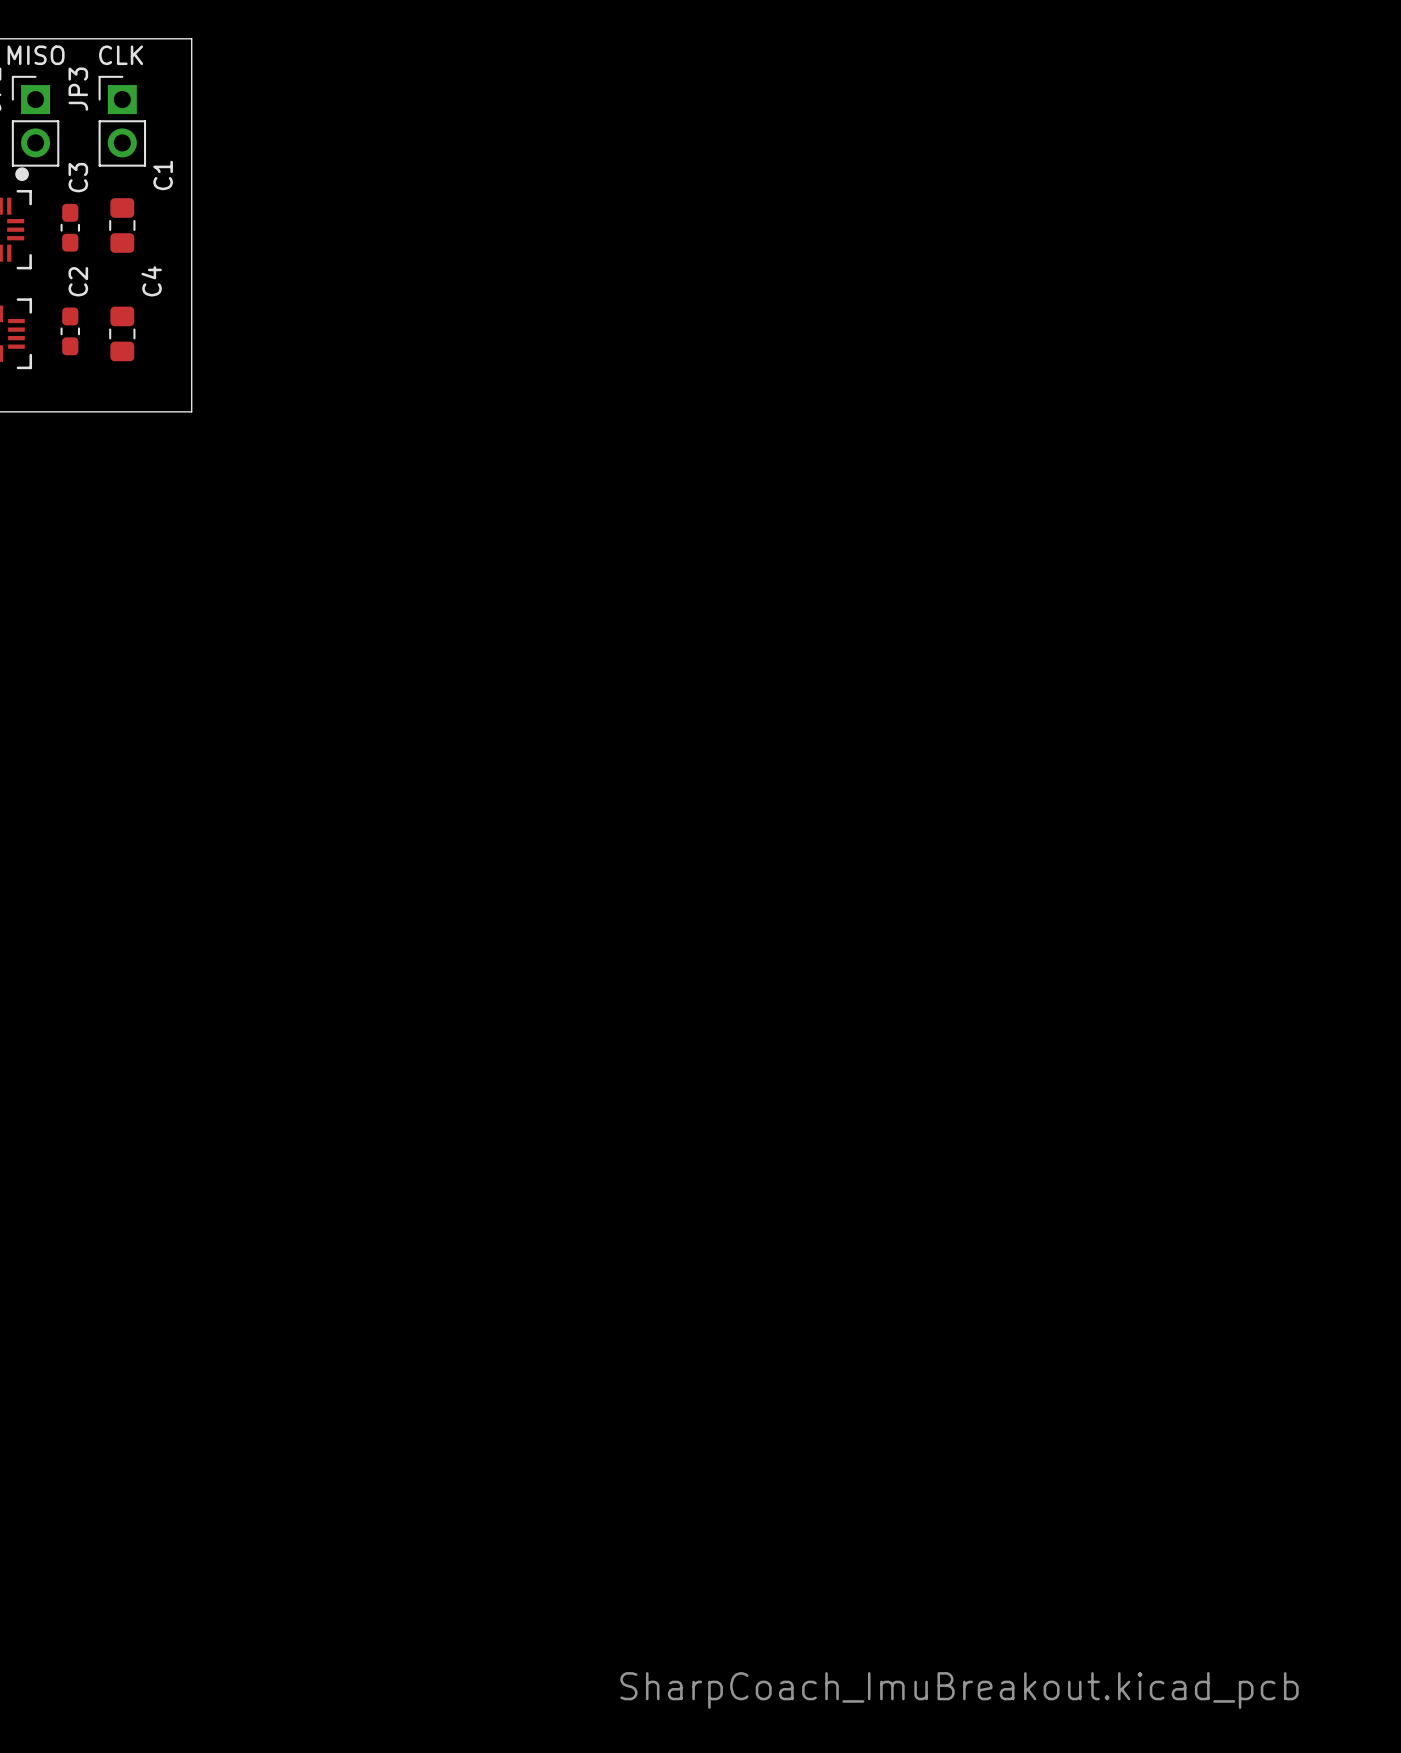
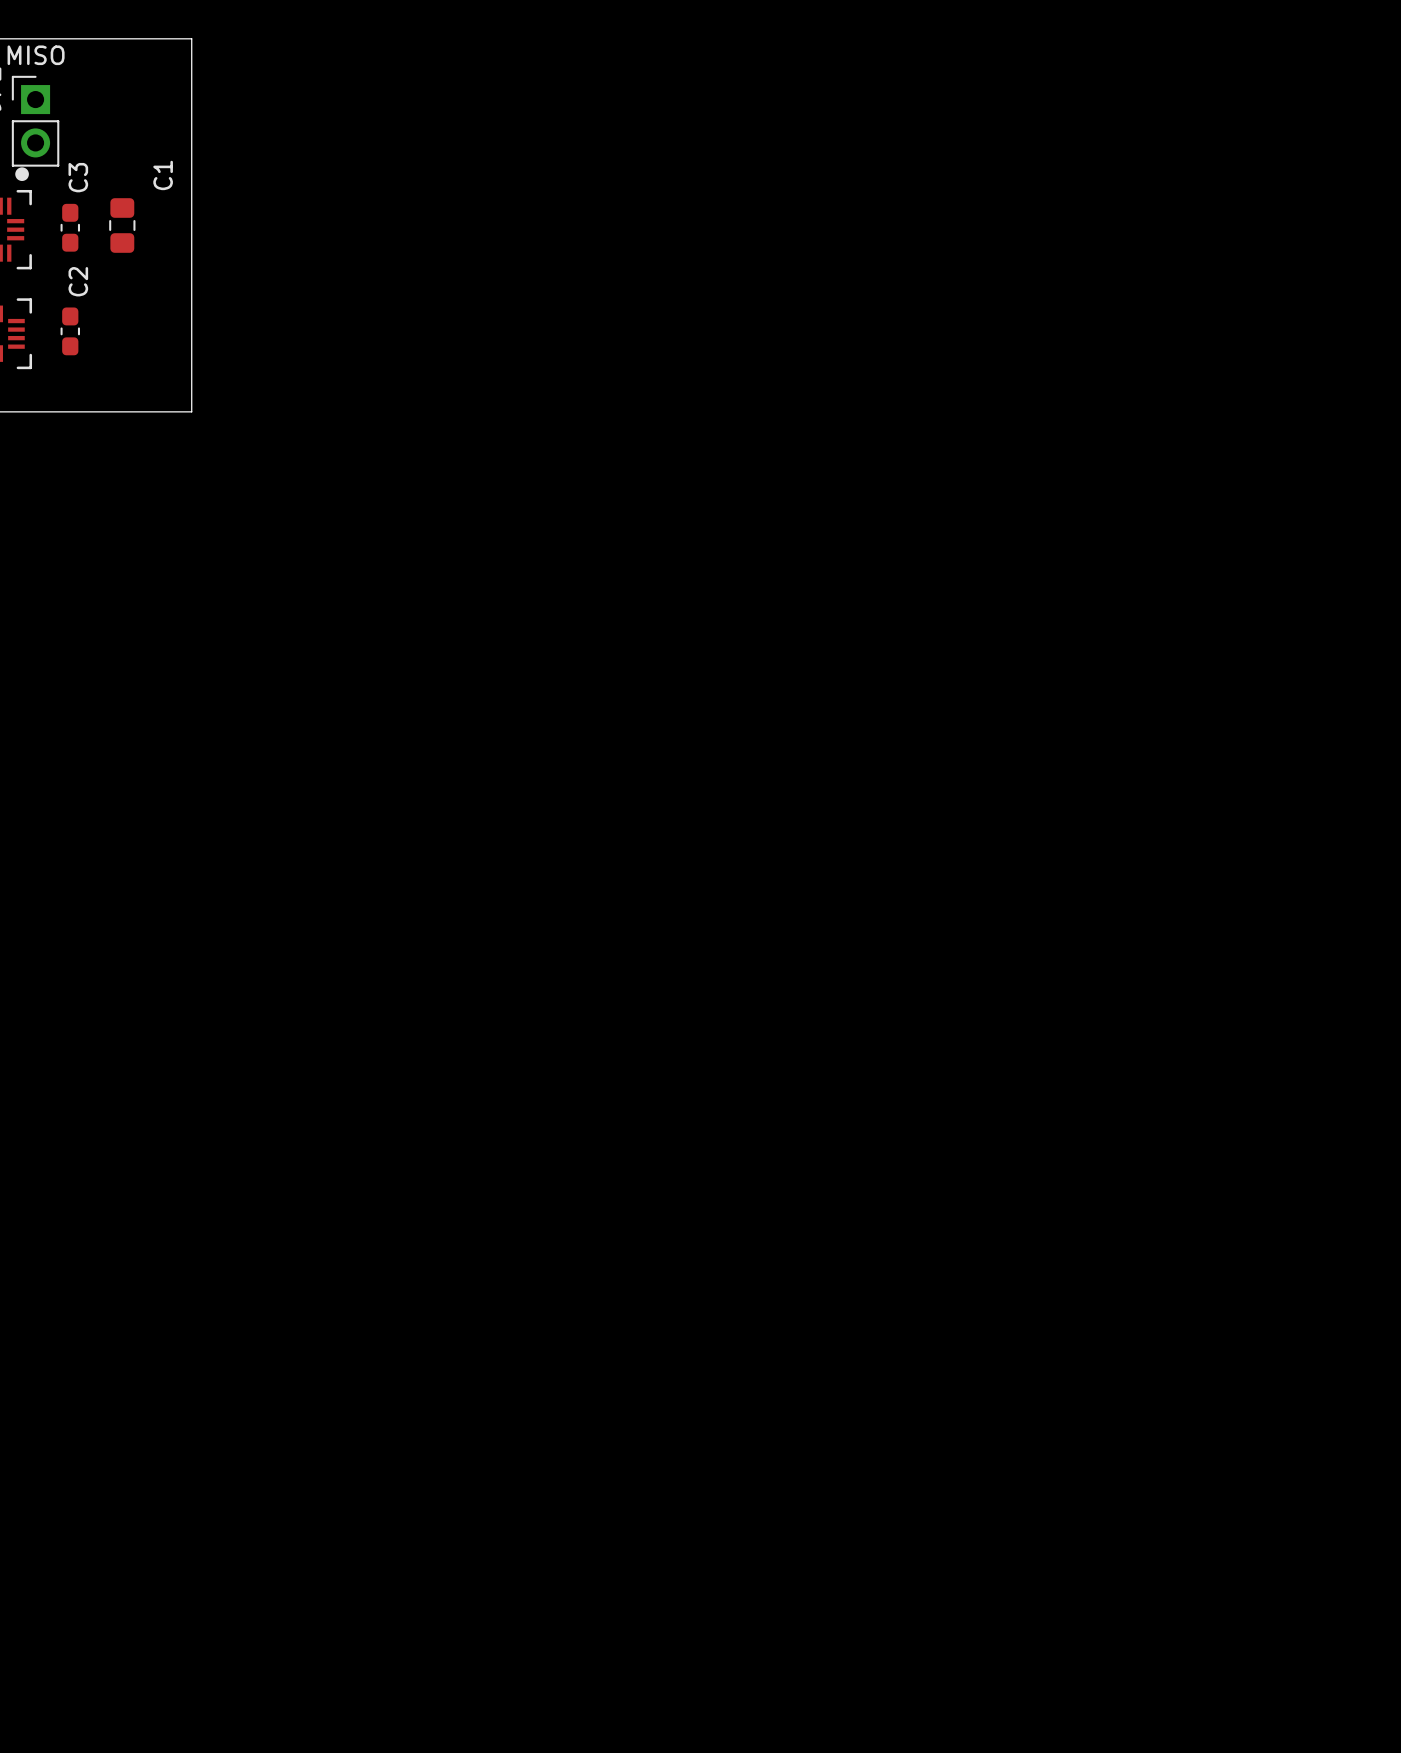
text: CLK (121, 55) -> none
JP3: (122, 121) -> none
C4: (122, 333) -> none
text: SharpCoach_ImuBreakout.kicad_pcb (959, 1690) -> none

